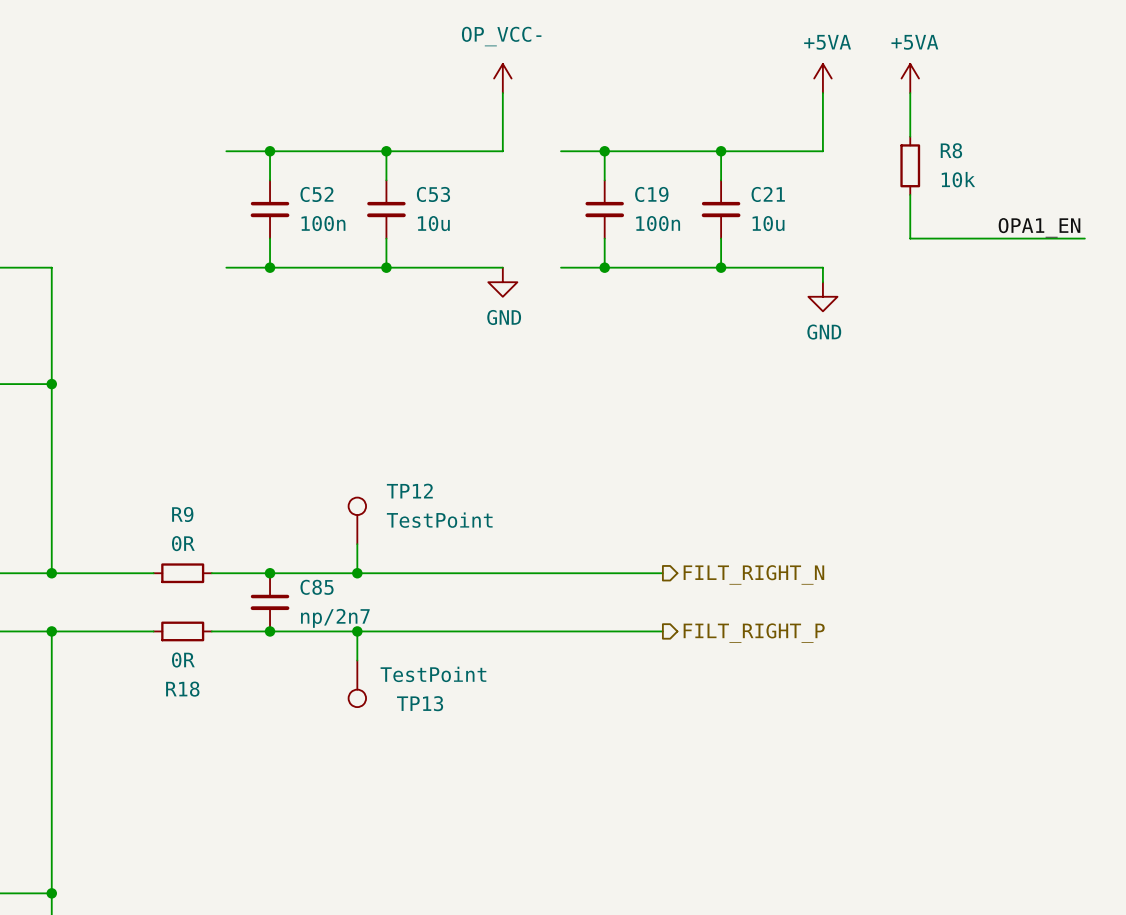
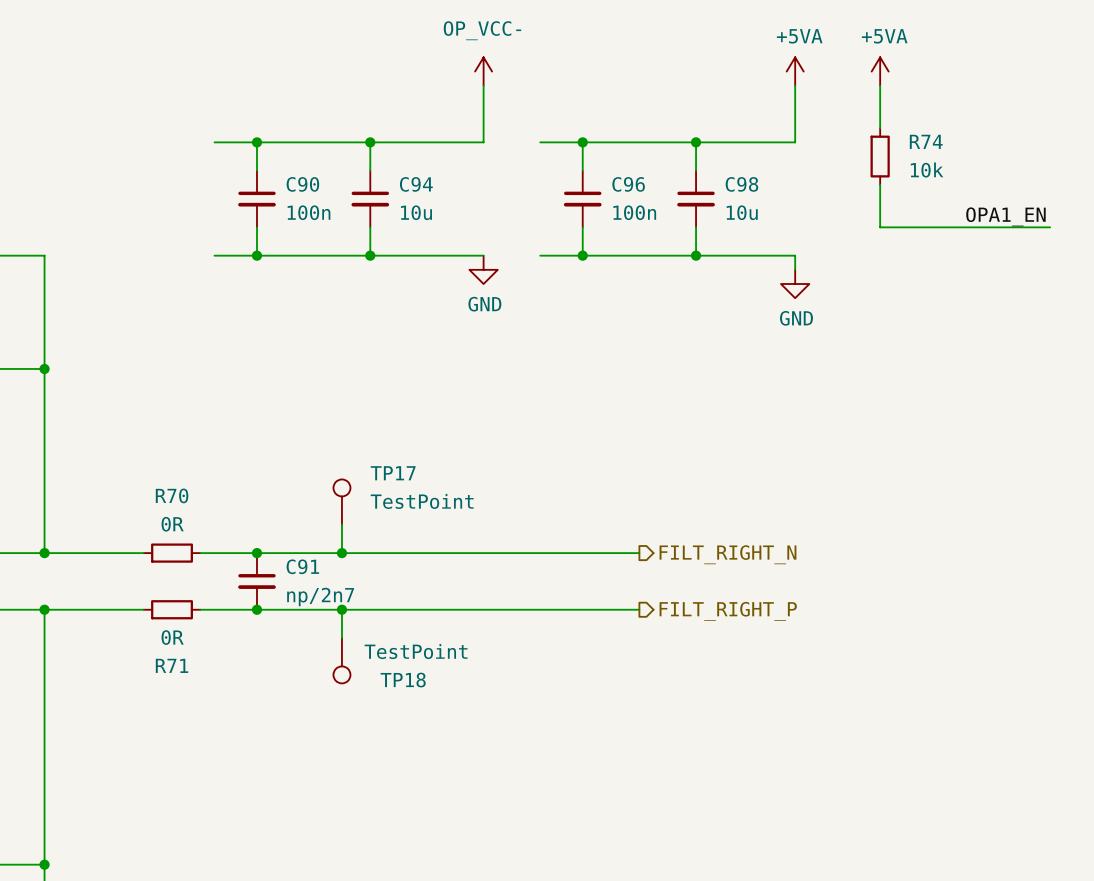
R8 name: R8 (951, 150) -> R74 (926, 141)
C52 name: C52 (316, 194) -> C90 (302, 184)
C53 name: C53 (433, 194) -> C94 (416, 184)
C19 name: C19 (651, 194) -> C96 (628, 184)
C21 name: C21 (768, 194) -> C98 (741, 184)
TP12 name: TP12 (409, 491) -> TP17 (393, 473)
R9 name: R9 (182, 514) -> R70 (172, 495)
C85 name: C85 (317, 587) -> C91 (302, 566)
R18 name: R18 (182, 689) -> R71 (172, 665)
TP13 name: TP13 (420, 703) -> TP18 (403, 680)

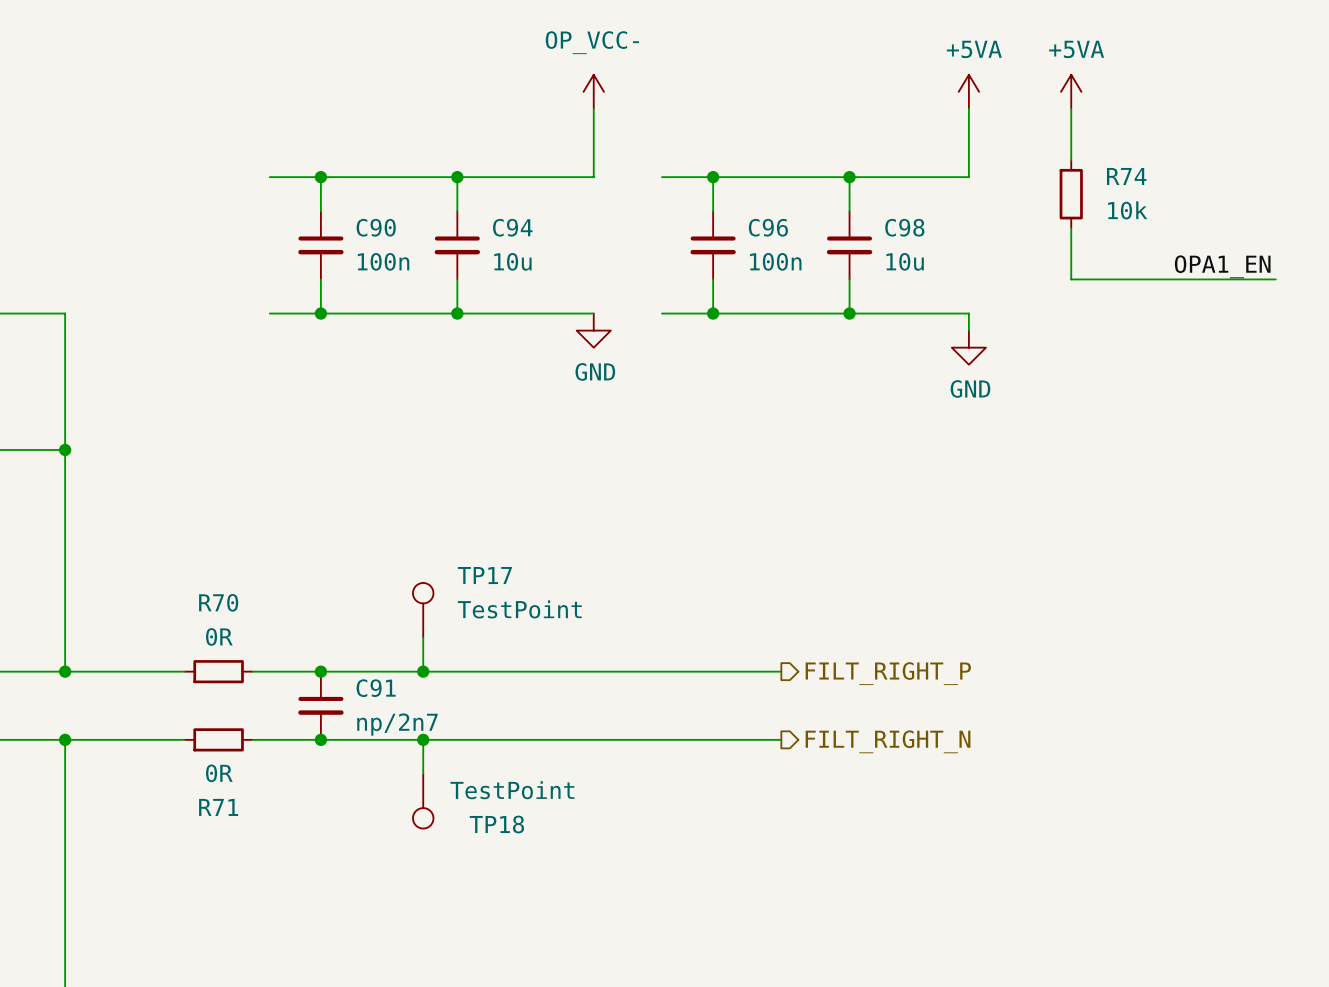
hierarchical label: FILT_RIGHT_N (727, 554) -> FILT_RIGHT_P (888, 673)
hierarchical label: FILT_RIGHT_P (728, 611) -> FILT_RIGHT_N (888, 741)

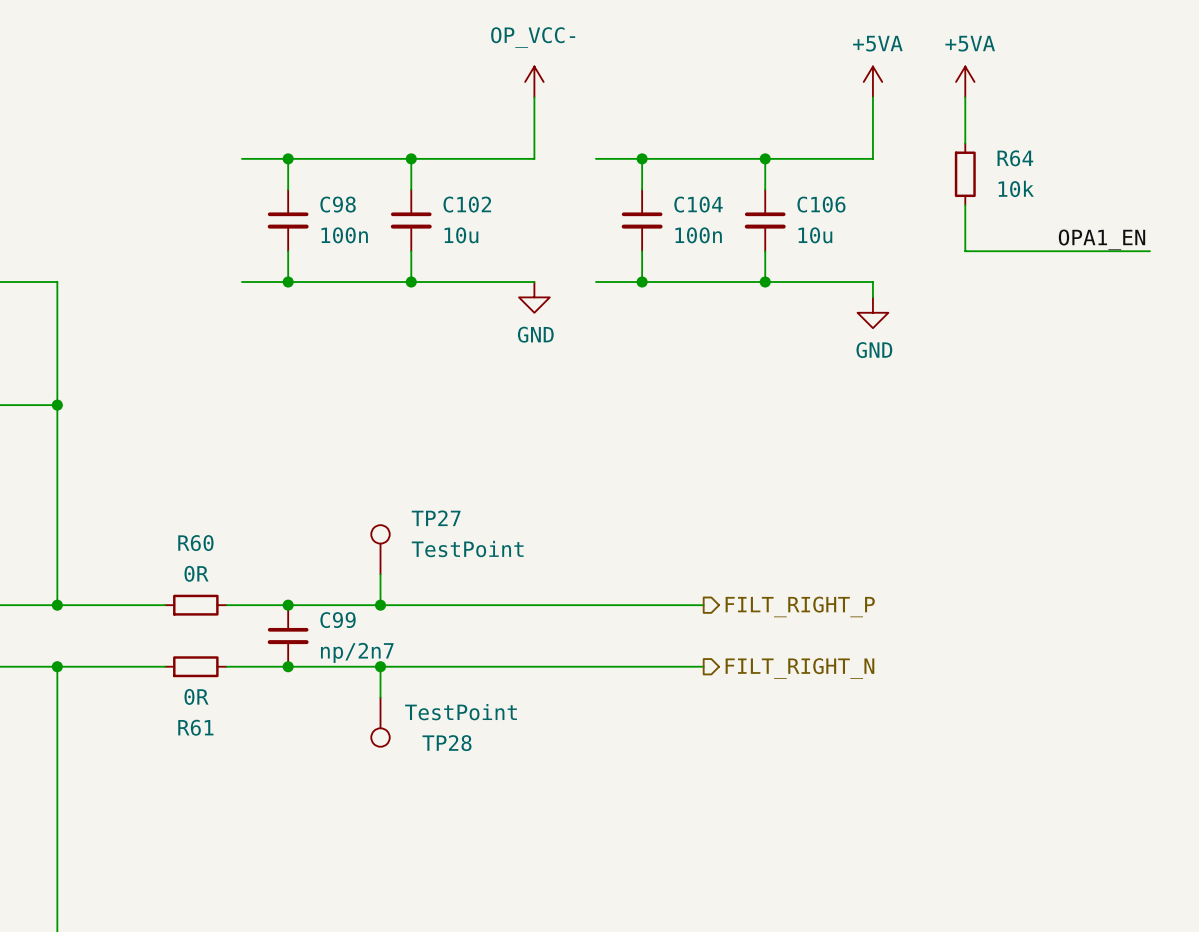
R74 name: R74 (1126, 176) -> R64 (1015, 158)
C90 name: C90 (376, 227) -> C98 (338, 204)
C94 name: C94 (512, 227) -> C102 (467, 204)
C96 name: C96 (768, 227) -> C104 (698, 204)
C98 name: C98 (904, 227) -> C106 (821, 204)
TP17 name: TP17 (484, 575) -> TP27 (436, 518)
R70 name: R70 (218, 602) -> R60 (195, 543)
C91 name: C91 (376, 688) -> C99 (338, 620)
R71 name: R71 (218, 807) -> R61 (195, 727)
TP18 name: TP18 (496, 824) -> TP28 (446, 743)

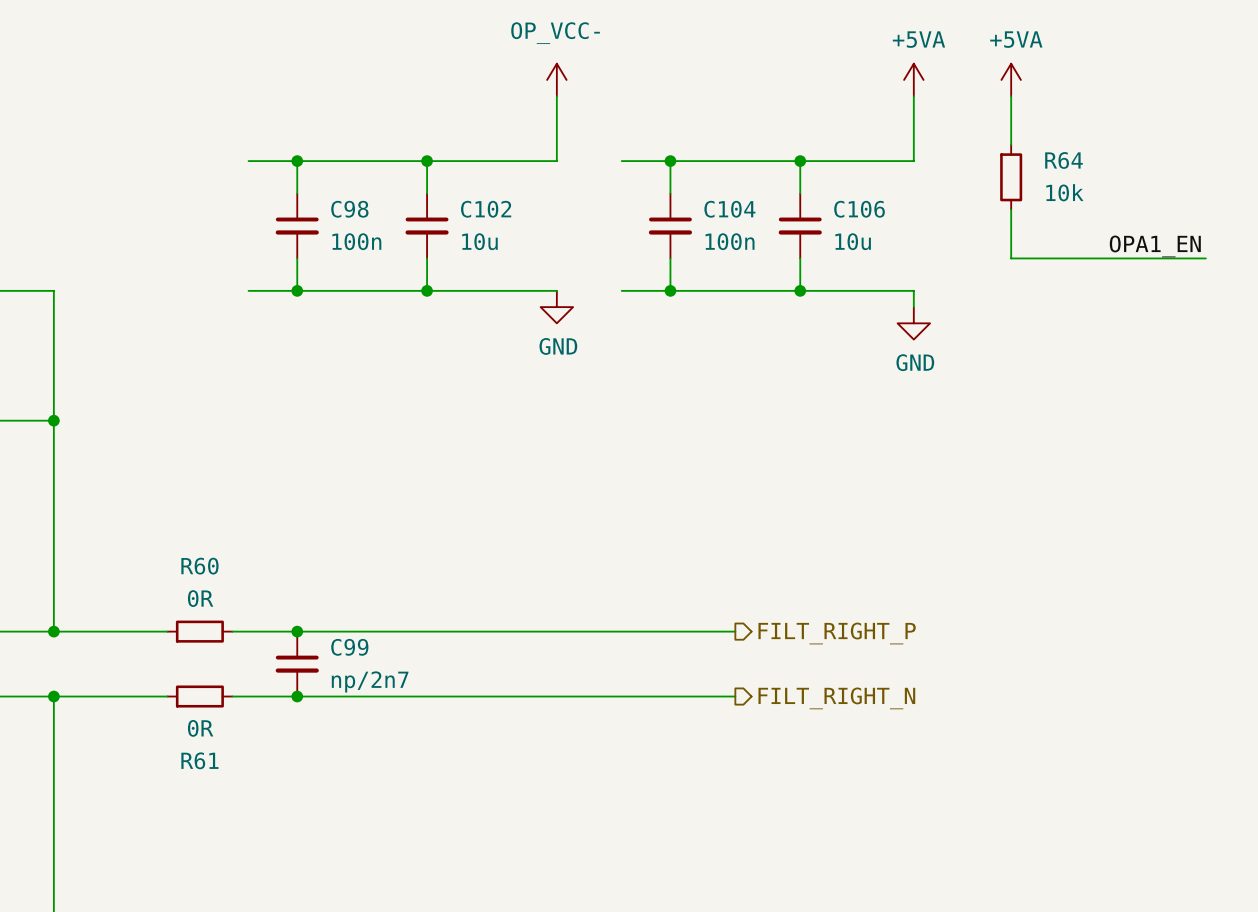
TP27: TestPoint (380, 549) -> none
wire: (380, 574) (380, 605) -> none
junction: (380, 605) -> none
wire: (380, 666) (380, 697) -> none
junction: (380, 666) -> none
TP28: TestPoint (380, 722) -> none

